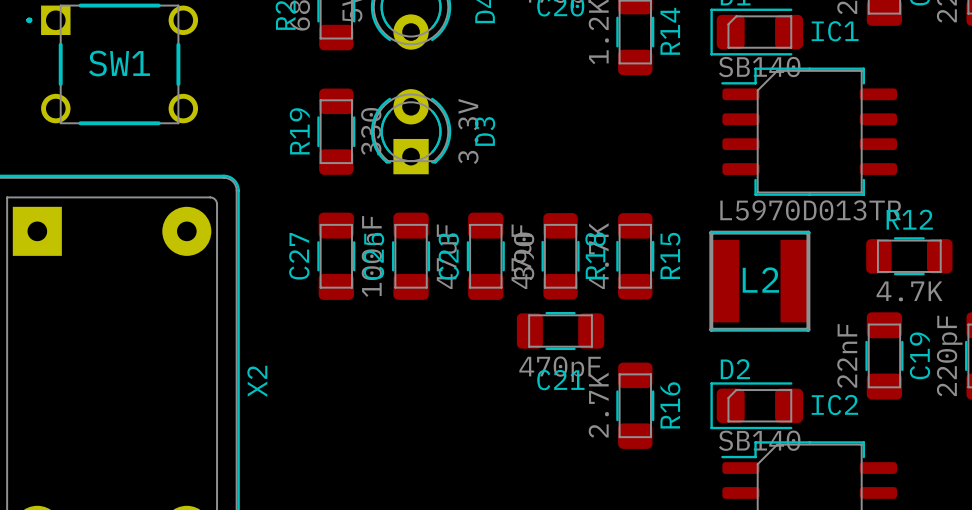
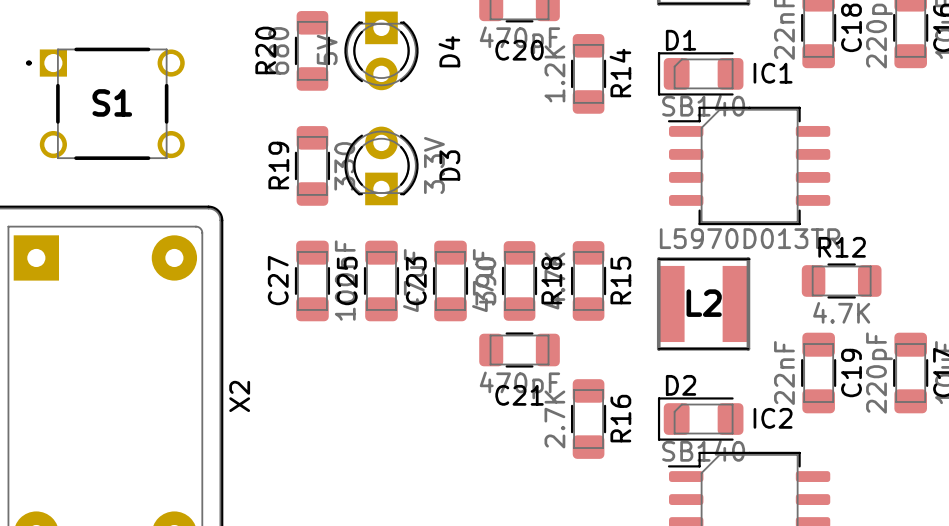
SW1 name: SW1 (119, 63) -> S1 (112, 102)

